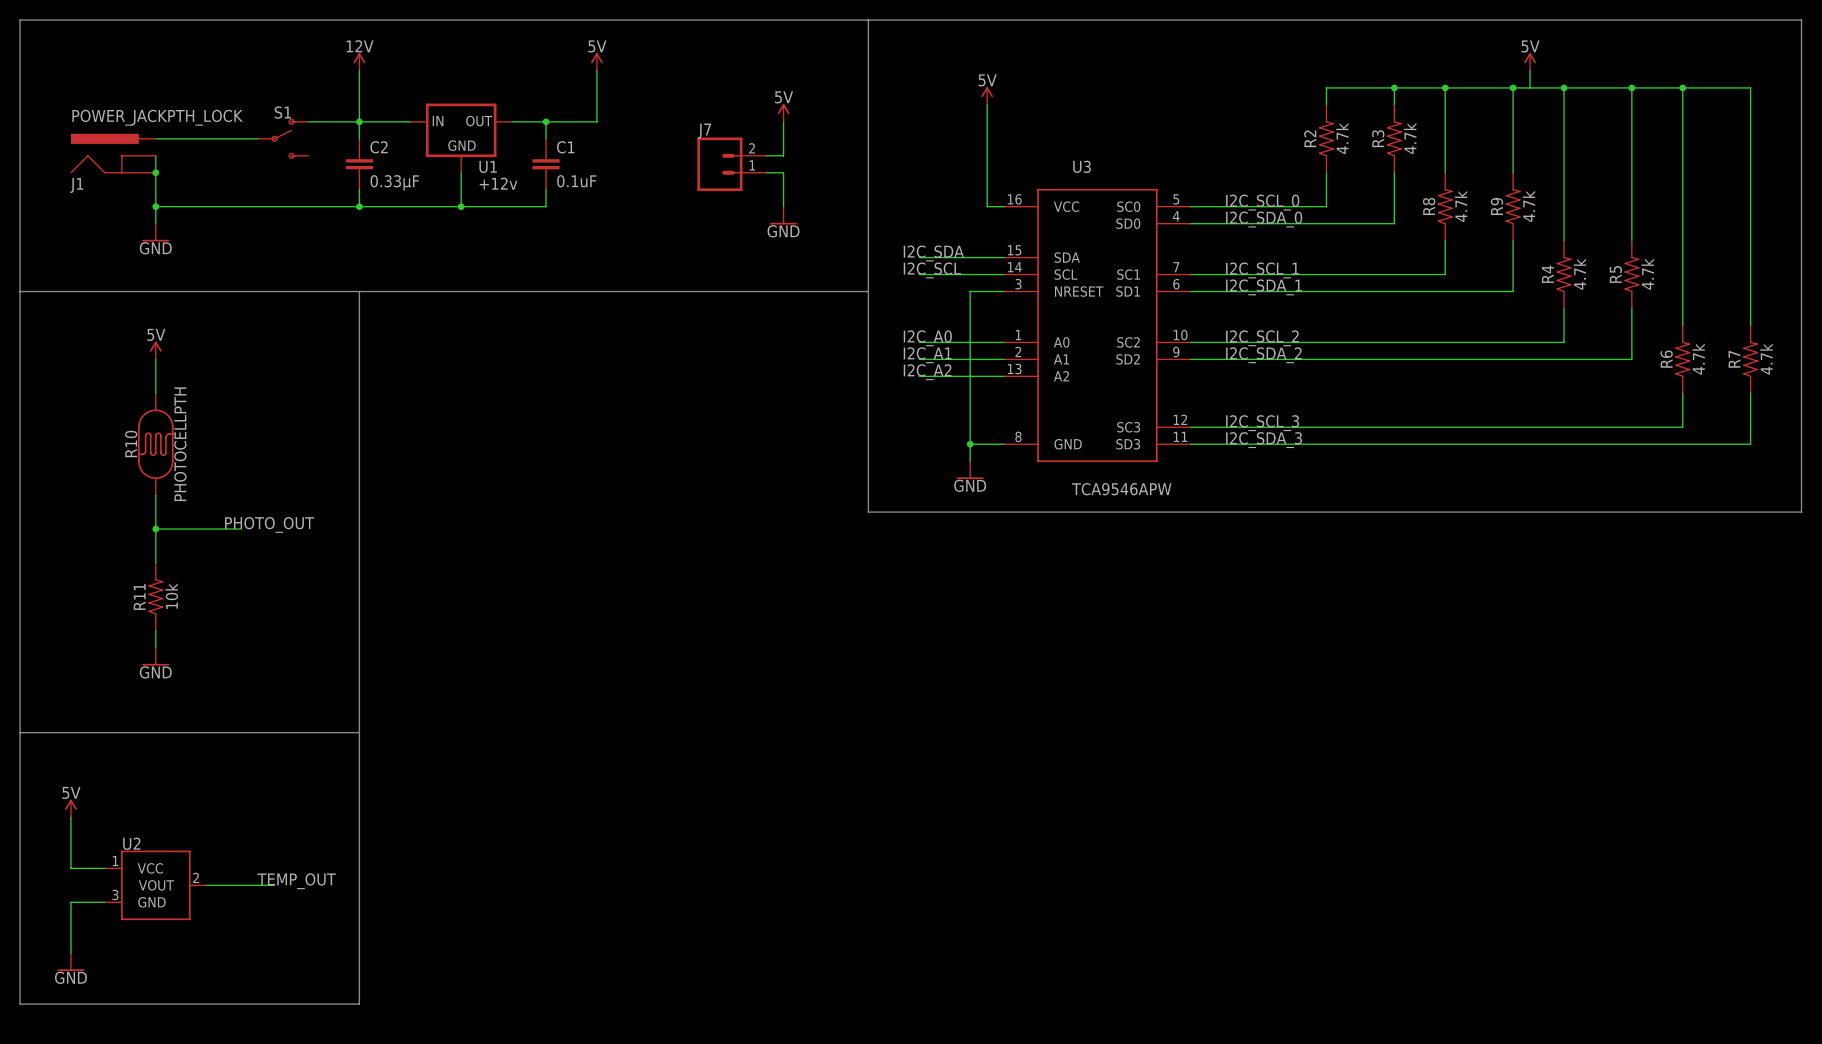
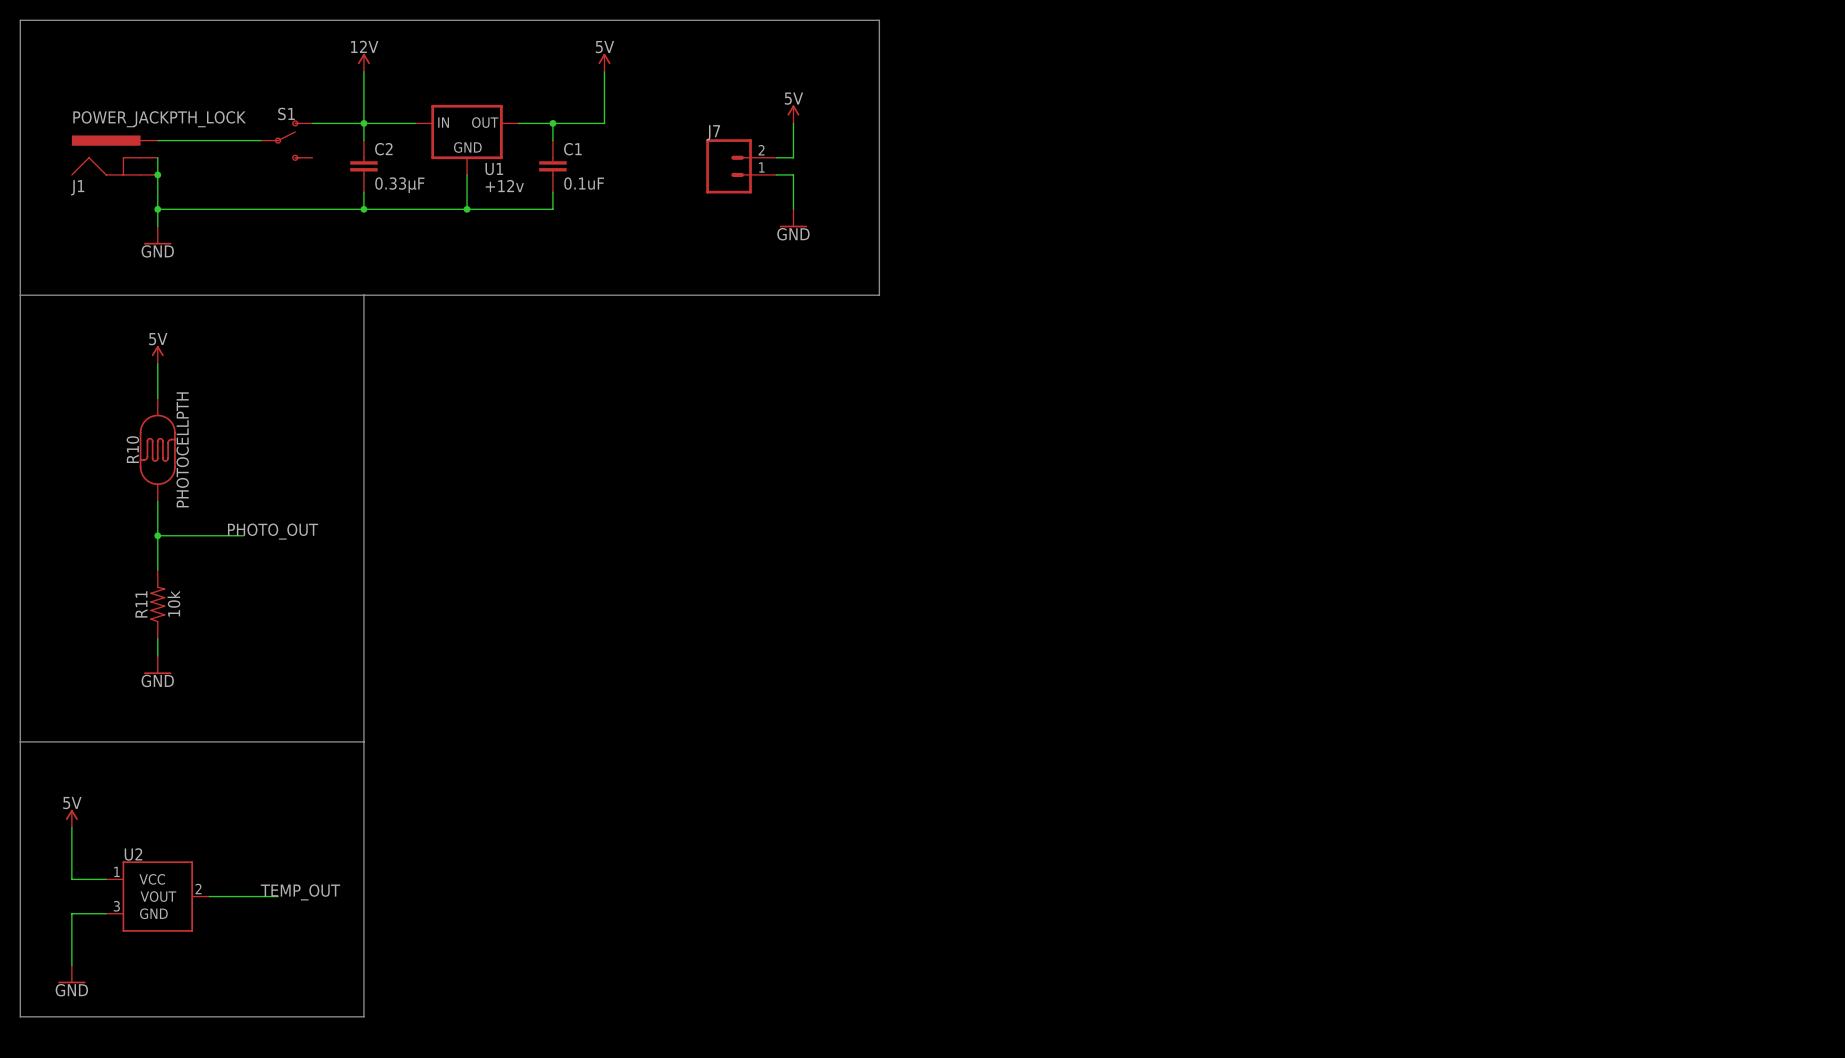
line: (868, 20) (1801, 20) (1801, 512) (868, 512) (868, 291) -> none
power symbol: 5V (1530, 62) -> none
wire: (1530, 70) (1530, 87) -> none
wire: (1394, 87) (1394, 104) -> none
junction: (1394, 87) -> none
wire: (1445, 87) (1445, 172) -> none
junction: (1445, 87) -> none
wire: (1513, 87) (1513, 172) -> none
junction: (1513, 87) -> none
wire: (1563, 87) (1563, 240) -> none
junction: (1563, 87) -> none
wire: (1631, 87) (1631, 240) -> none
junction: (1631, 87) -> none
wire: (1682, 87) (1682, 325) -> none
junction: (1682, 87) -> none
power symbol: 5V (987, 95) -> none
wire: (987, 104) (987, 206) (1004, 206) -> none
wire: (1326, 104) (1326, 87) (1750, 87) (1750, 325) -> none
R2: 4.7k (1326, 138) -> none
R3: 4.7k (1394, 138) -> none
wire: (1326, 172) (1326, 206) (1190, 206) -> none
wire: (1394, 172) (1394, 223) (1190, 223) -> none
label: I2C_SCL_0 (1262, 202) -> none
R8: 4.7k (1445, 206) -> none
R9: 4.7k (1513, 206) -> none
label: I2C_SDA_0 (1264, 219) -> none
wire: (1445, 240) (1445, 274) (1190, 274) -> none
wire: (1513, 240) (1513, 291) (1190, 291) -> none
label: I2C_SDA (933, 253) -> none
wire: (919, 257) (1004, 257) -> none
label: I2C_SCL (932, 270) -> none
label: I2C_SCL_1 (1262, 270) -> none
wire: (919, 274) (1004, 274) -> none
R4: 4.7k (1563, 274) -> none
R5: 4.7k (1631, 274) -> none
label: I2C_SDA_1 (1263, 287) -> none
wire: (1004, 291) (970, 291) (970, 461) -> none
wire: (1563, 308) (1563, 342) (1190, 342) -> none
wire: (1631, 308) (1631, 359) (1190, 359) -> none
U3: TCA9546APW (1097, 325) -> none
label: I2C_A0 (927, 338) -> none
label: I2C_SCL_2 (1262, 338) -> none
wire: (919, 342) (1004, 342) -> none
label: I2C_A1 (927, 355) -> none
label: I2C_SDA_2 (1263, 355) -> none
wire: (919, 359) (1004, 359) -> none
R6: 4.7k (1682, 359) -> none
R7: 4.7k (1750, 359) -> none
label: I2C_A2 (927, 372) -> none
wire: (919, 376) (1004, 376) -> none
wire: (1682, 393) (1682, 427) (1190, 427) -> none
wire: (1750, 393) (1750, 444) (1190, 444) -> none
label: I2C_SCL_3 (1262, 423) -> none
label: I2C_SDA_3 (1264, 440) -> none
wire: (970, 444) (1004, 444) -> none
junction: (970, 444) -> none
power symbol: GND (970, 470) -> none

